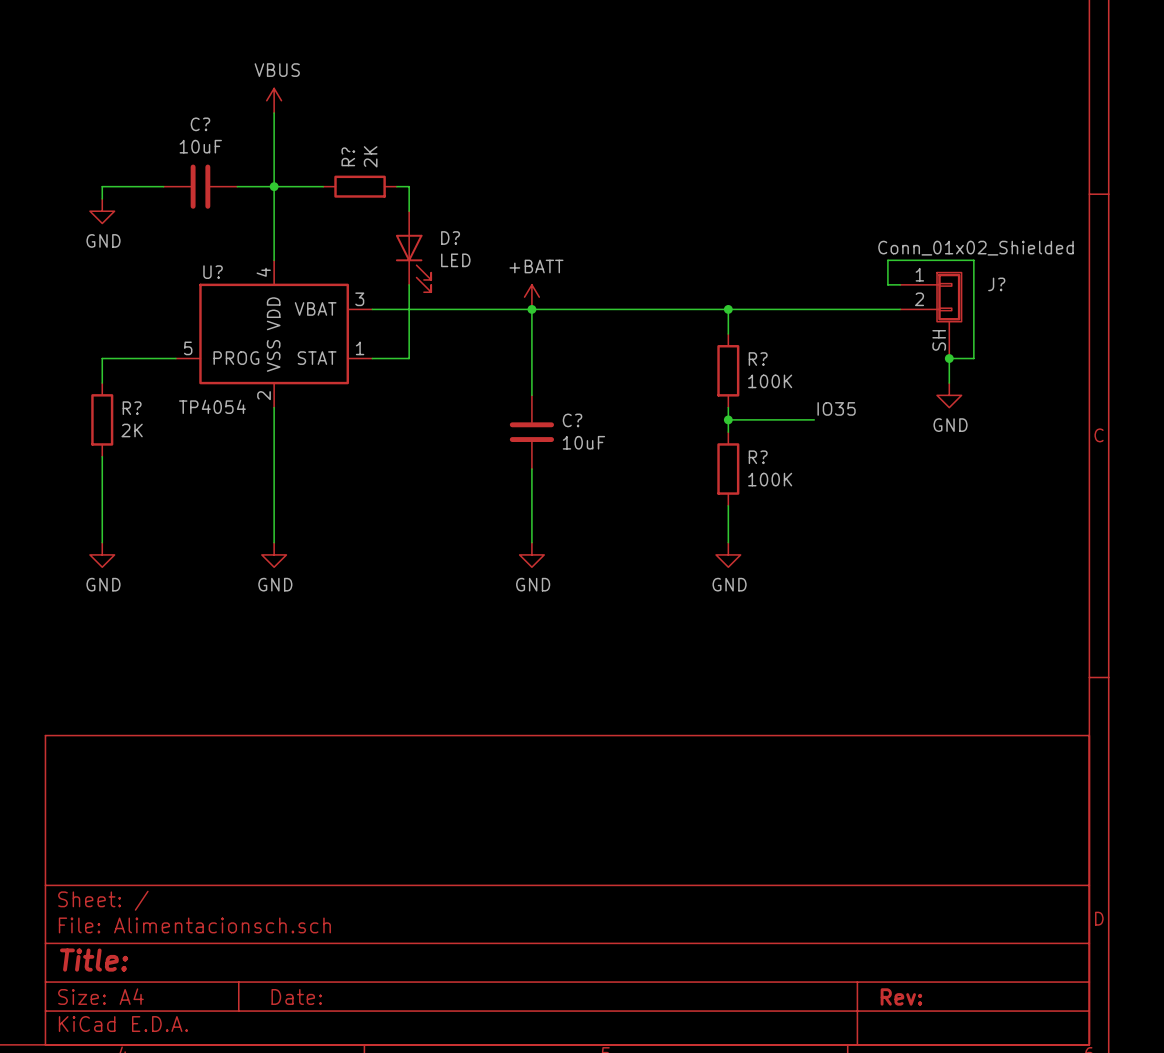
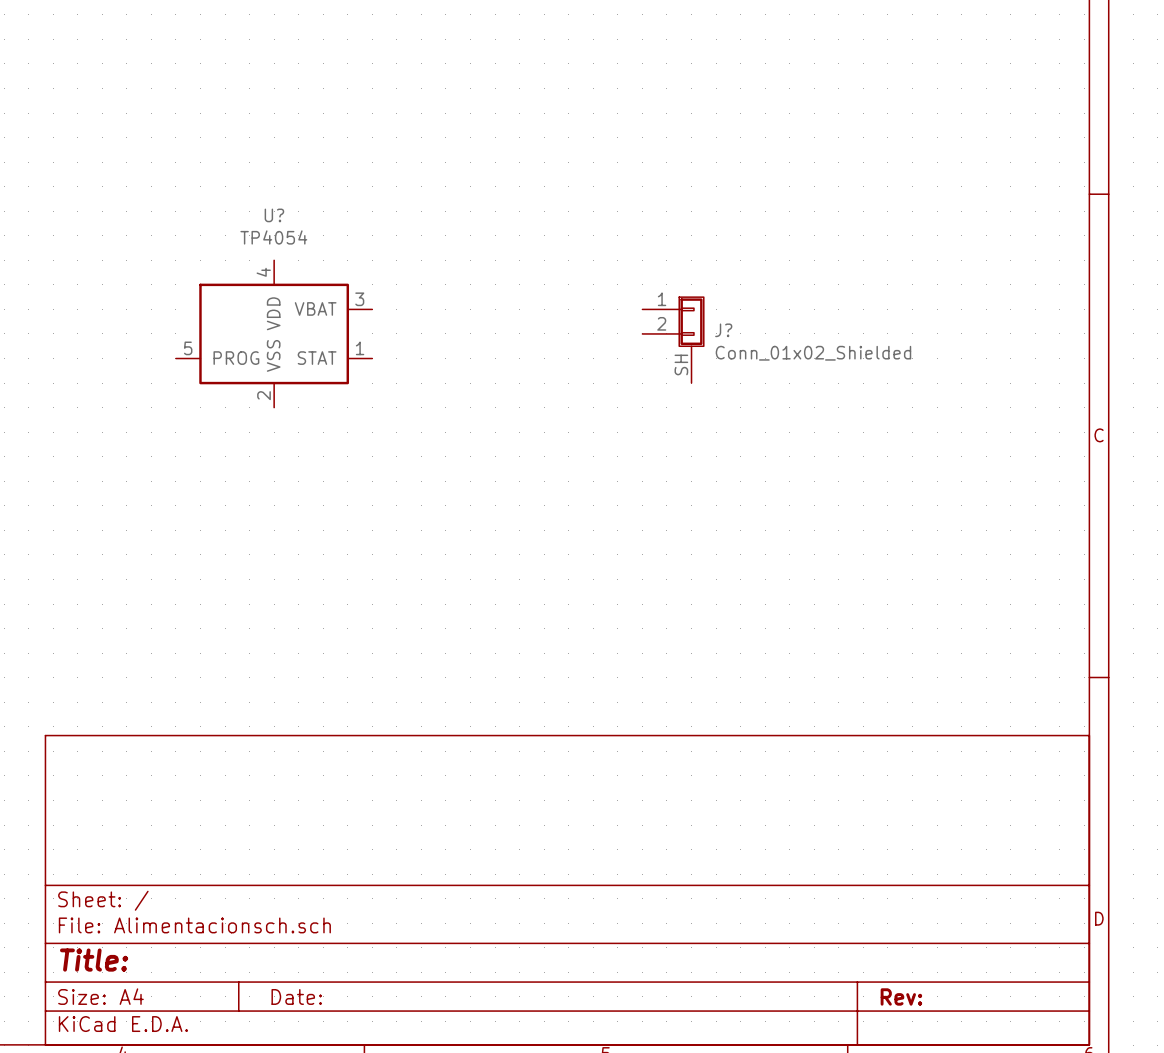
power symbol: VBUS (274, 100) -> none
wire: (274, 113) (274, 260) -> none
wire: (163, 186) (102, 186) (102, 198) -> none
C?: 10uF (200, 186) -> none
wire: (237, 186) (323, 186) -> none
junction: (274, 186) -> none
R?: 2K (360, 186) -> none
wire: (396, 186) (409, 186) (409, 211) -> none
power symbol: GND (102, 211) -> none
D?: LED (413, 251) -> none
U? name position: U? (213, 272) -> U? (274, 215)
wire: (409, 284) (409, 358) (372, 358) -> none
wire: (900, 284) (887, 284) (887, 260) (973, 260) (973, 358) (949, 358) (949, 383) -> none
power symbol: +BATT (531, 297) -> none
wire: (372, 309) (900, 309) -> none
wire: (531, 309) (531, 395) -> none
junction: (531, 309) -> none
wire: (728, 309) (728, 333) -> none
junction: (728, 309) -> none
J?: Conn_01x02_Shielded (931, 315) -> none
J?: none -> Conn_01x02_Shielded (673, 339)
wire: (175, 358) (102, 358) (102, 383) -> none
junction: (949, 358) -> none
R?: 100K (728, 370) -> none
power symbol: GND (949, 395) -> none
U? value position: TP4054 (212, 406) -> TP4054 (273, 237)
wire: (274, 407) (274, 542) -> none
wire: (728, 407) (728, 432) -> none
label: IO35 (836, 408) -> none
R?: 2K (102, 419) -> none
wire: (728, 419) (814, 419) -> none
junction: (728, 419) -> none
C?: 10uF (531, 432) -> none
wire: (102, 456) (102, 542) -> none
wire: (531, 469) (531, 542) -> none
R?: 100K (728, 469) -> none
wire: (728, 505) (728, 542) -> none
power symbol: GND (102, 554) -> none
power symbol: GND (274, 554) -> none
power symbol: GND (531, 554) -> none
power symbol: GND (728, 554) -> none

